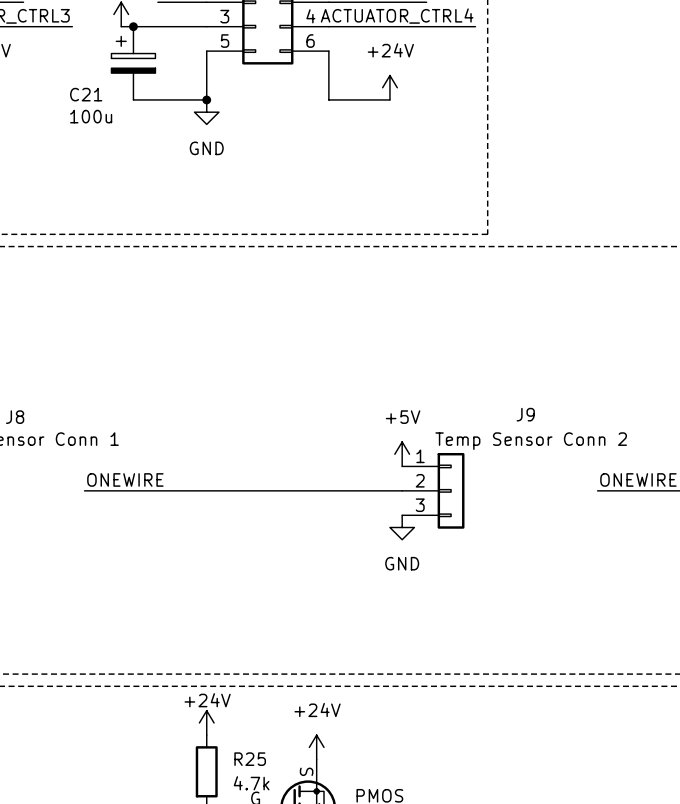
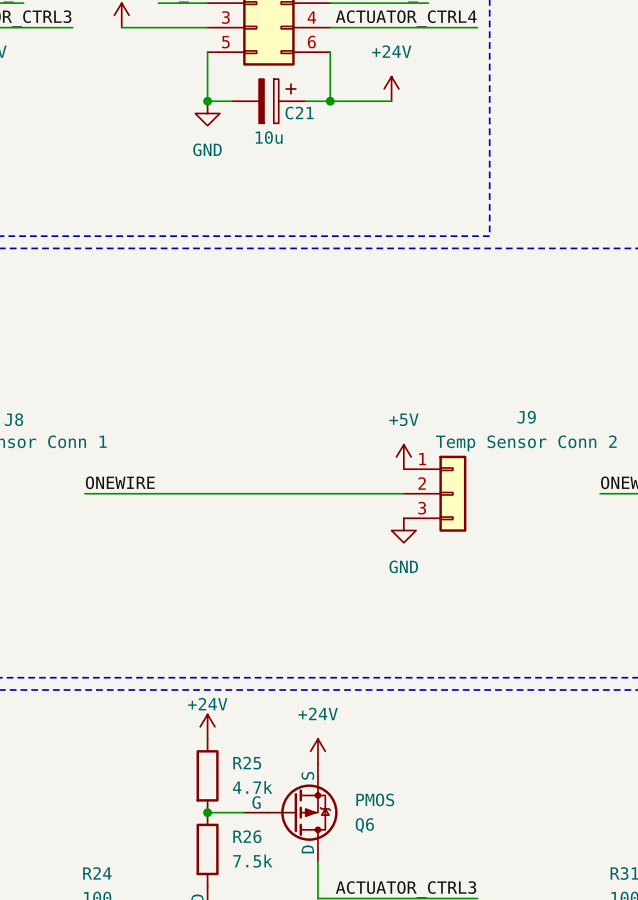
junction: (133, 26) -> none
C21 rotation: 0° (133, 54) -> 90° clockwise (277, 101)
C21 position: (133, 63) -> (268, 101)
C21 name position: C21 (86, 94) -> C21 (299, 113)
wire: (133, 99) (206, 99) -> (232, 101) (207, 101)
wire: none -> (305, 101) (330, 101)
junction: none -> (330, 101)
C21 value: 100u (91, 116) -> 10u (269, 137)

